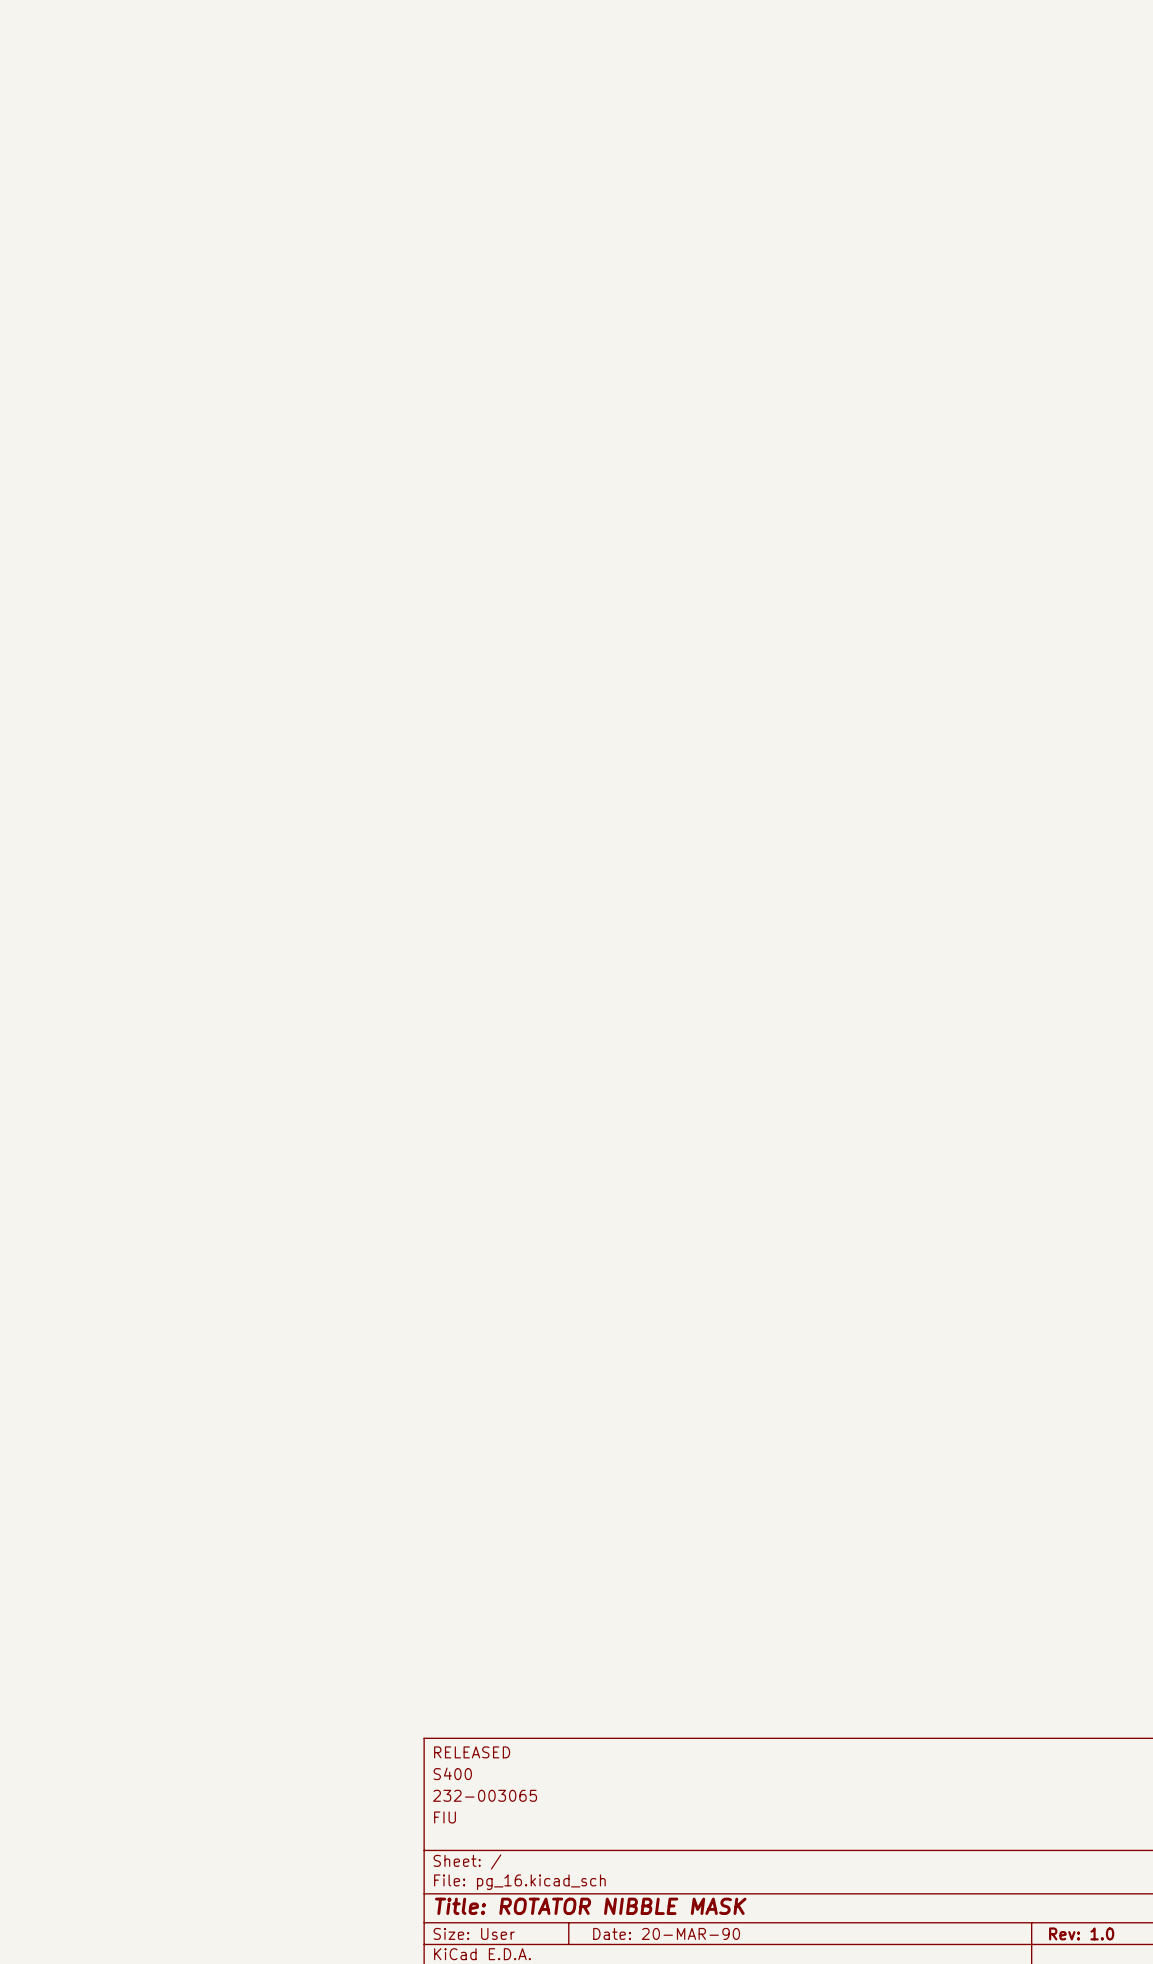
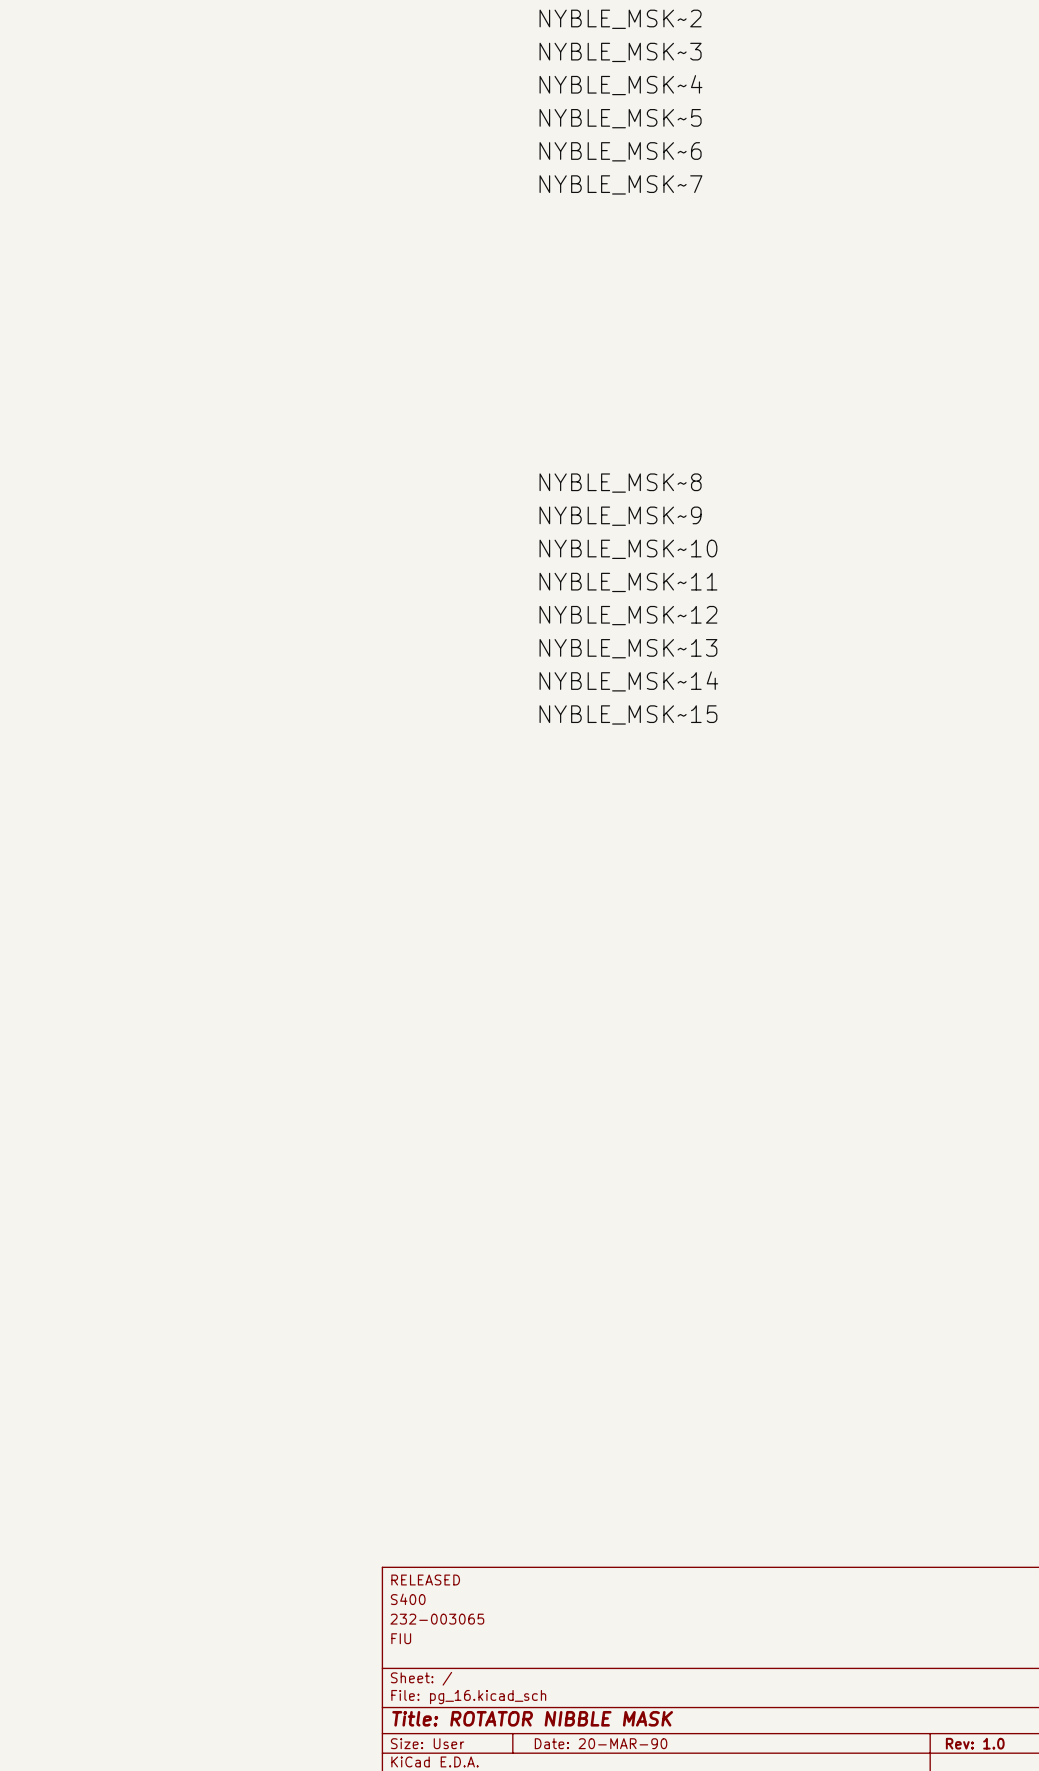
label: none -> NYBLE_MSK~2 (620, 19)
label: none -> NYBLE_MSK~3 (620, 52)
label: none -> NYBLE_MSK~4 (620, 85)
label: none -> NYBLE_MSK~5 (620, 118)
label: none -> NYBLE_MSK~6 (620, 151)
label: none -> NYBLE_MSK~7 (620, 184)
label: none -> NYBLE_MSK~8 (620, 483)
label: none -> NYBLE_MSK~9 (620, 516)
label: none -> NYBLE_MSK~10 (628, 549)
label: none -> NYBLE_MSK~11 (628, 582)
label: none -> NYBLE_MSK~12 (628, 615)
label: none -> NYBLE_MSK~13 (628, 648)
label: none -> NYBLE_MSK~14 (628, 681)
label: none -> NYBLE_MSK~15 (628, 714)

